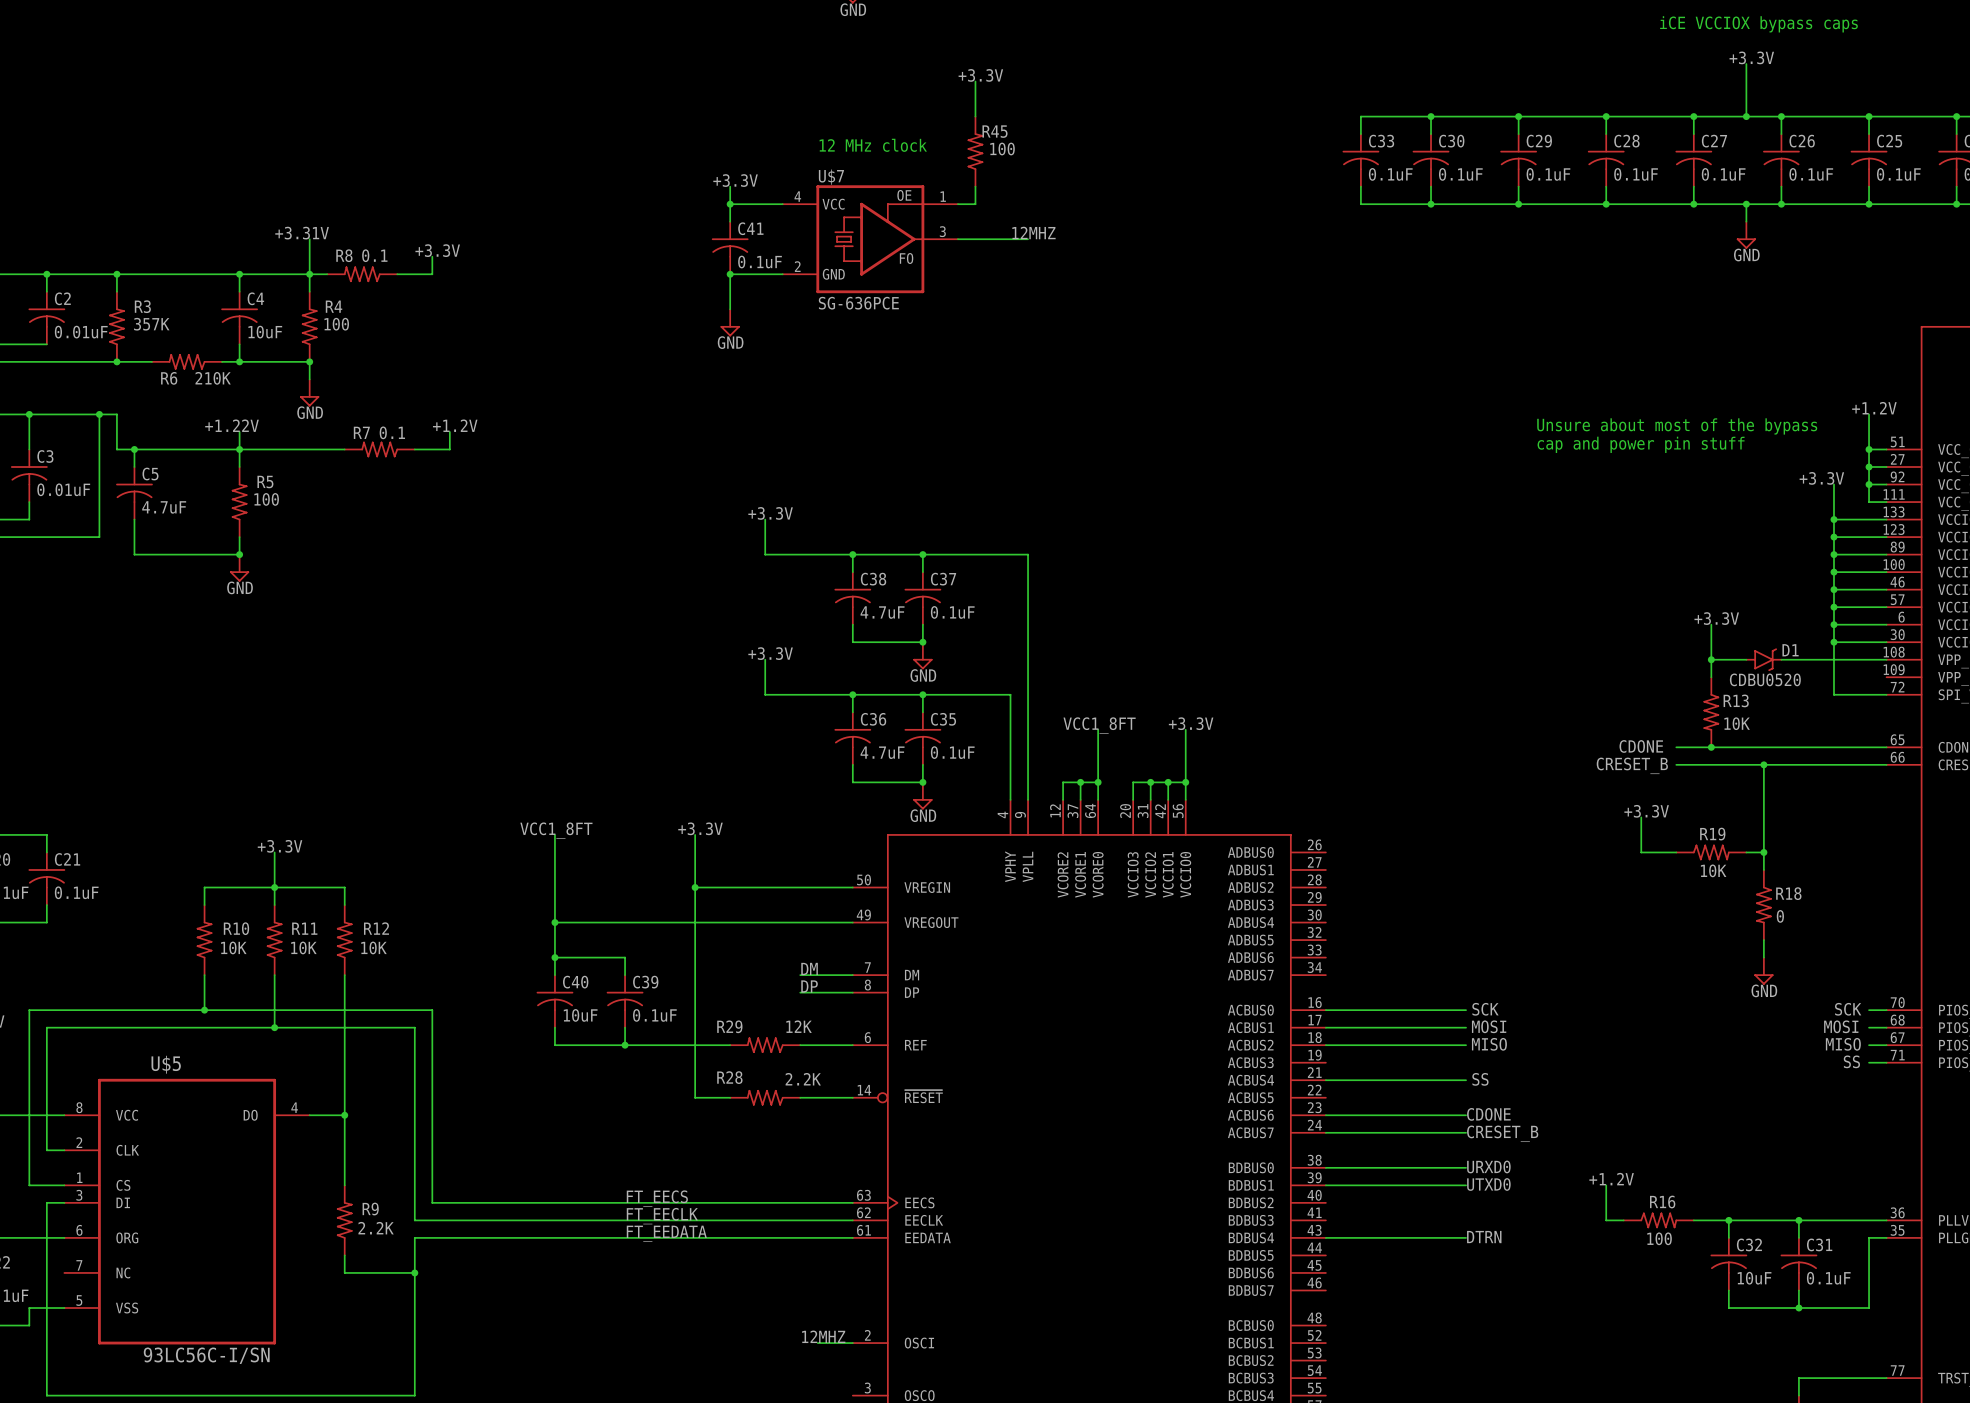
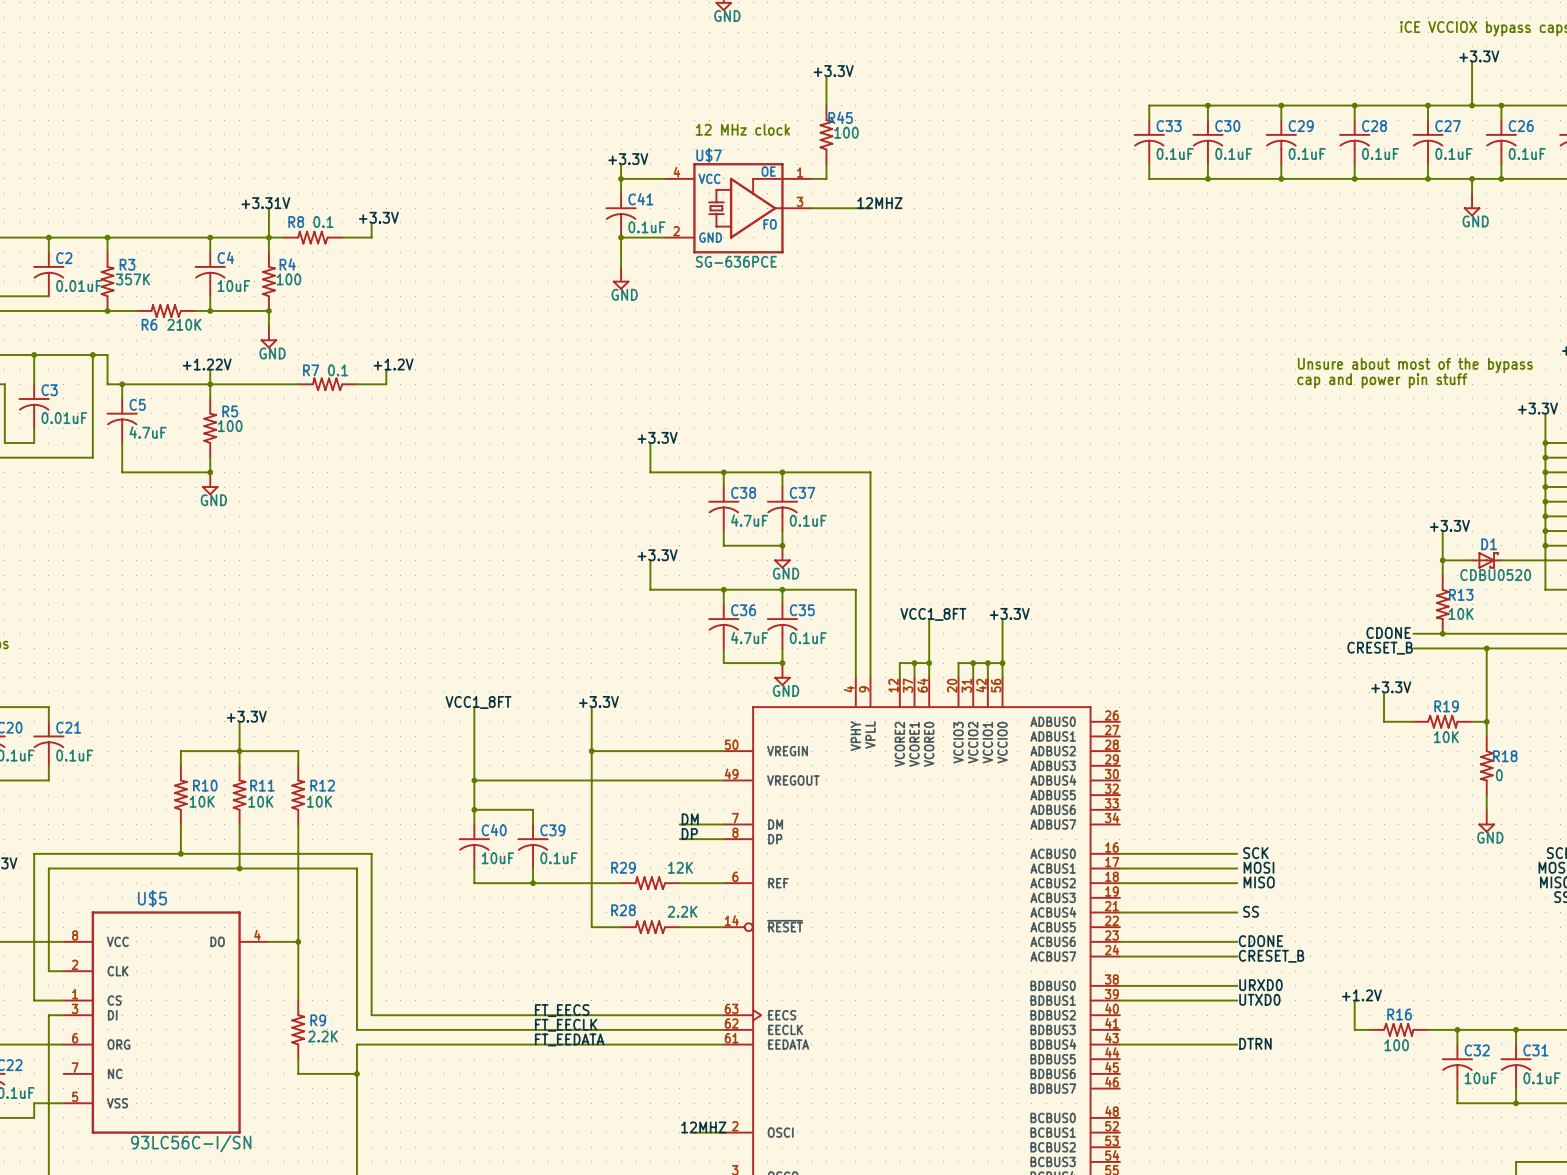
D1 symbol: [1745, 648, 1782, 672] -> [1472, 552, 1502, 569]
D1 name position: D1 (1790, 650) -> D1 (1489, 544)

